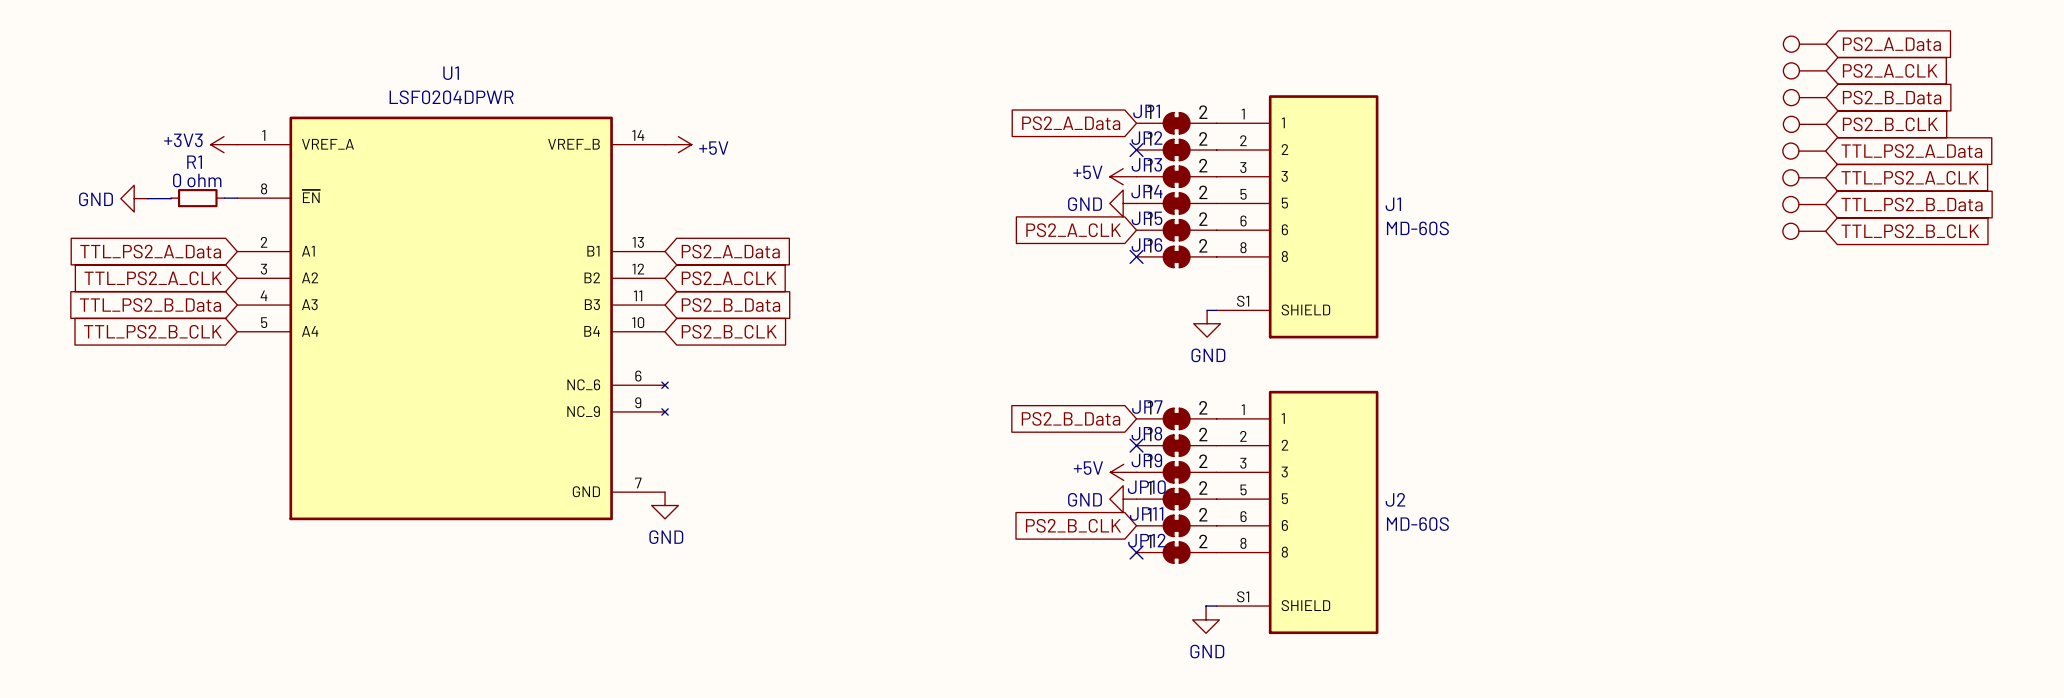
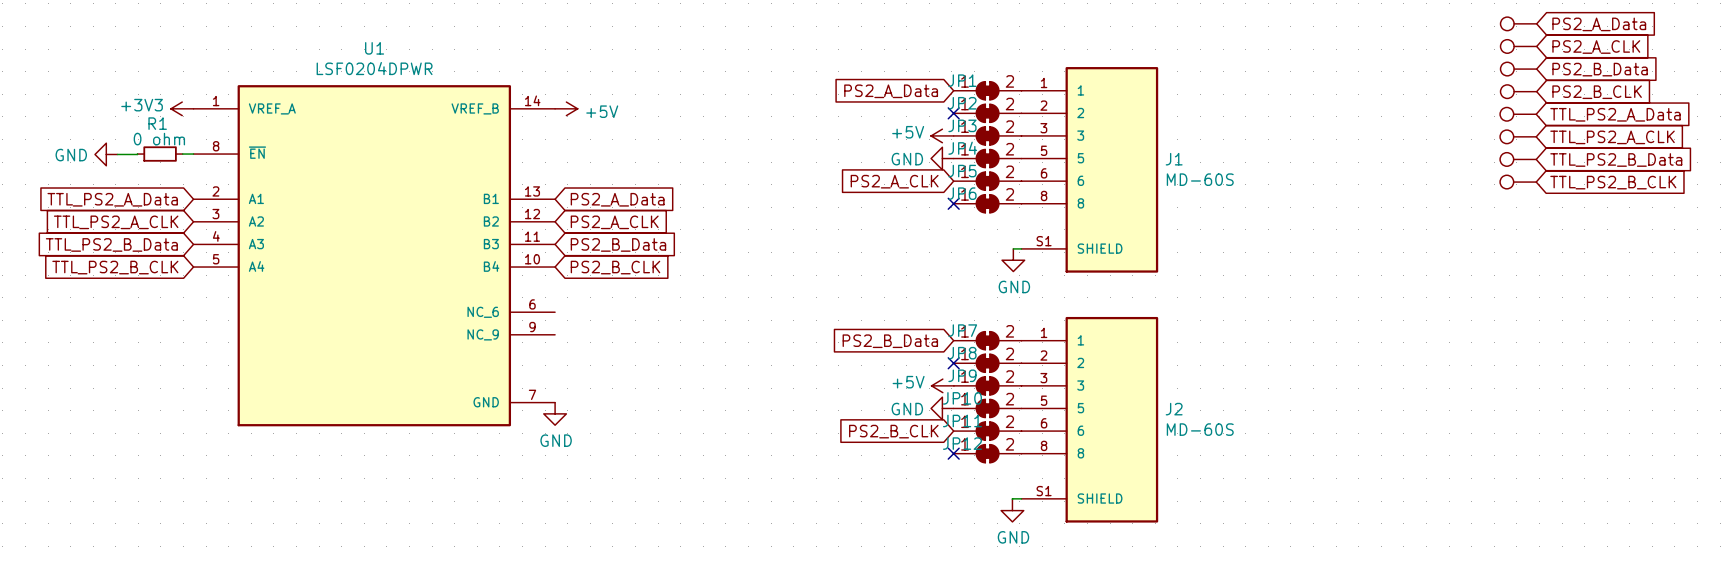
U1 symbol: [237, 116, 669, 521] -> [193, 85, 556, 427]

